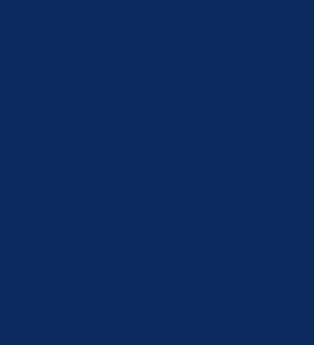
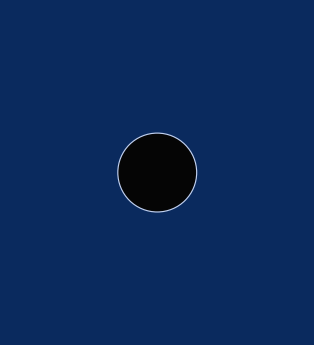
part: none -> (157, 172)

